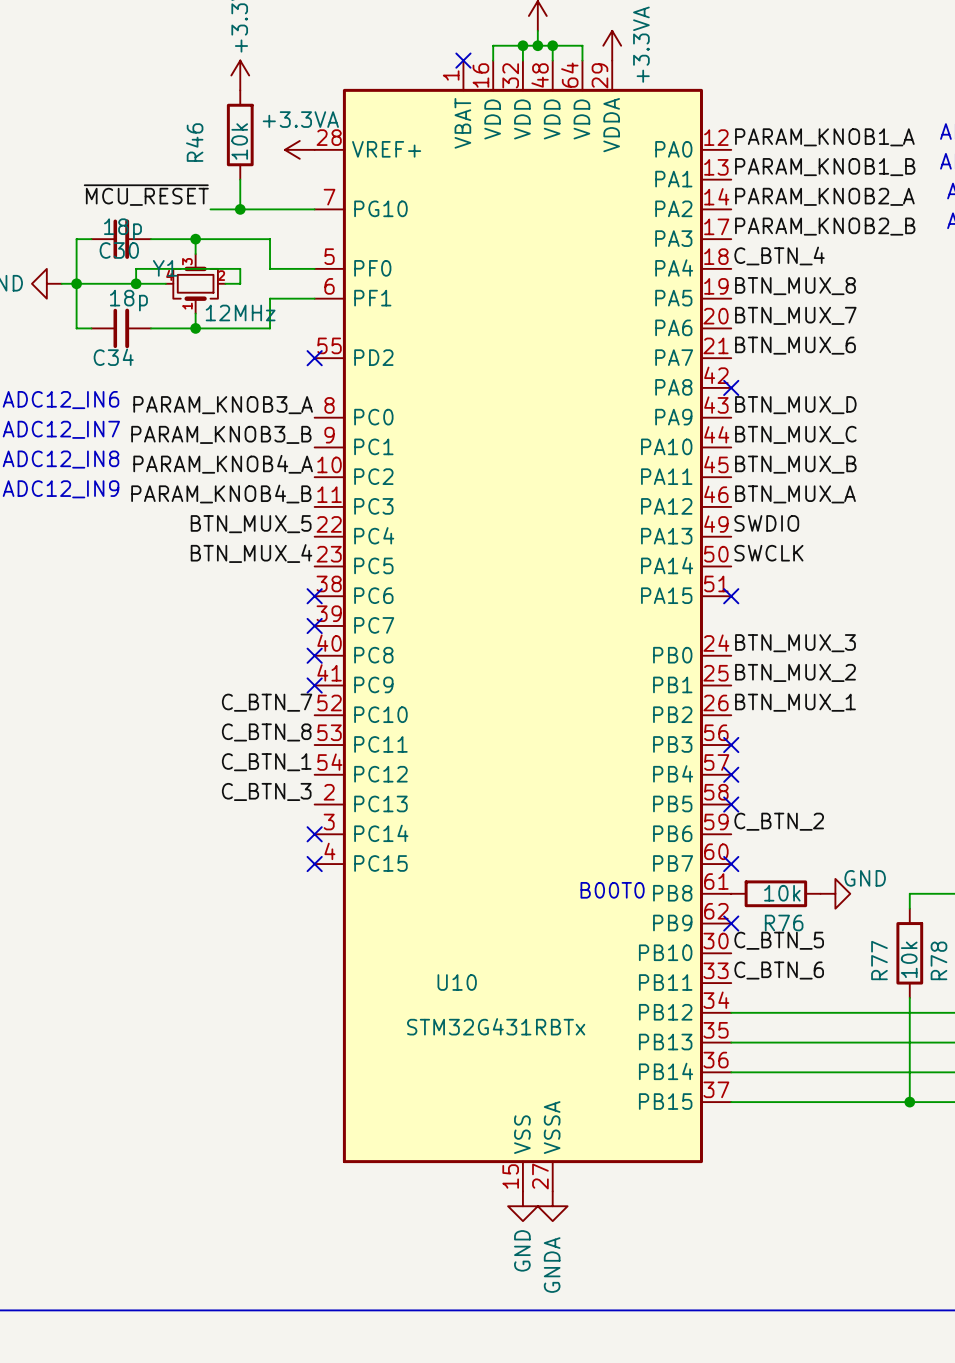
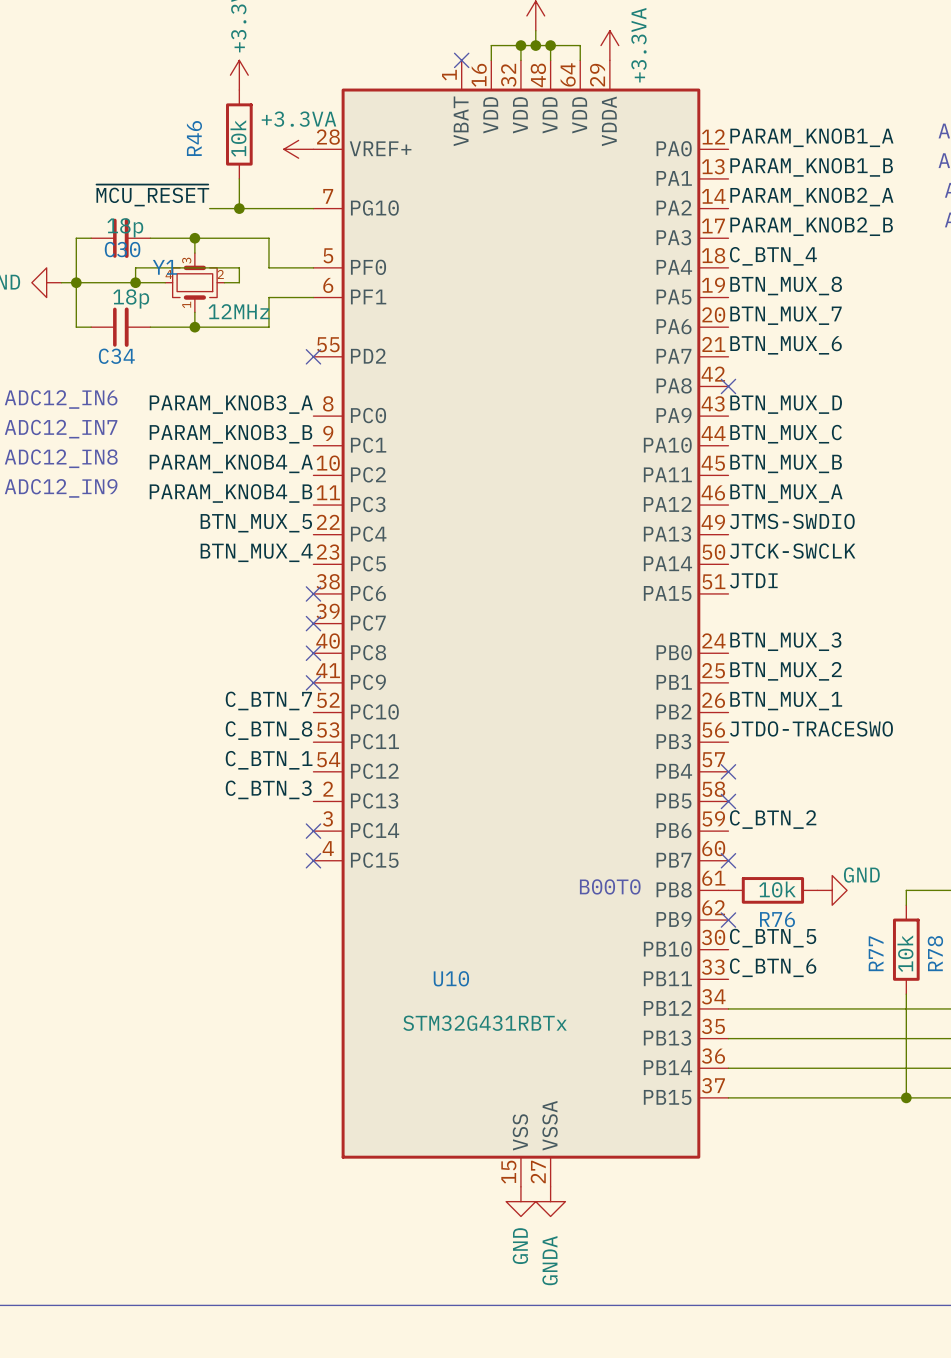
label: SWDIO (766, 523) -> JTMS-SWDIO (792, 521)
label: SWCLK (768, 553) -> JTCK-SWCLK (792, 551)
label: none -> JTDI (753, 580)
no-connect mark: (731, 596) -> none
label: none -> JTDO-TRACESWO (811, 728)
no-connect mark: (731, 745) -> none

